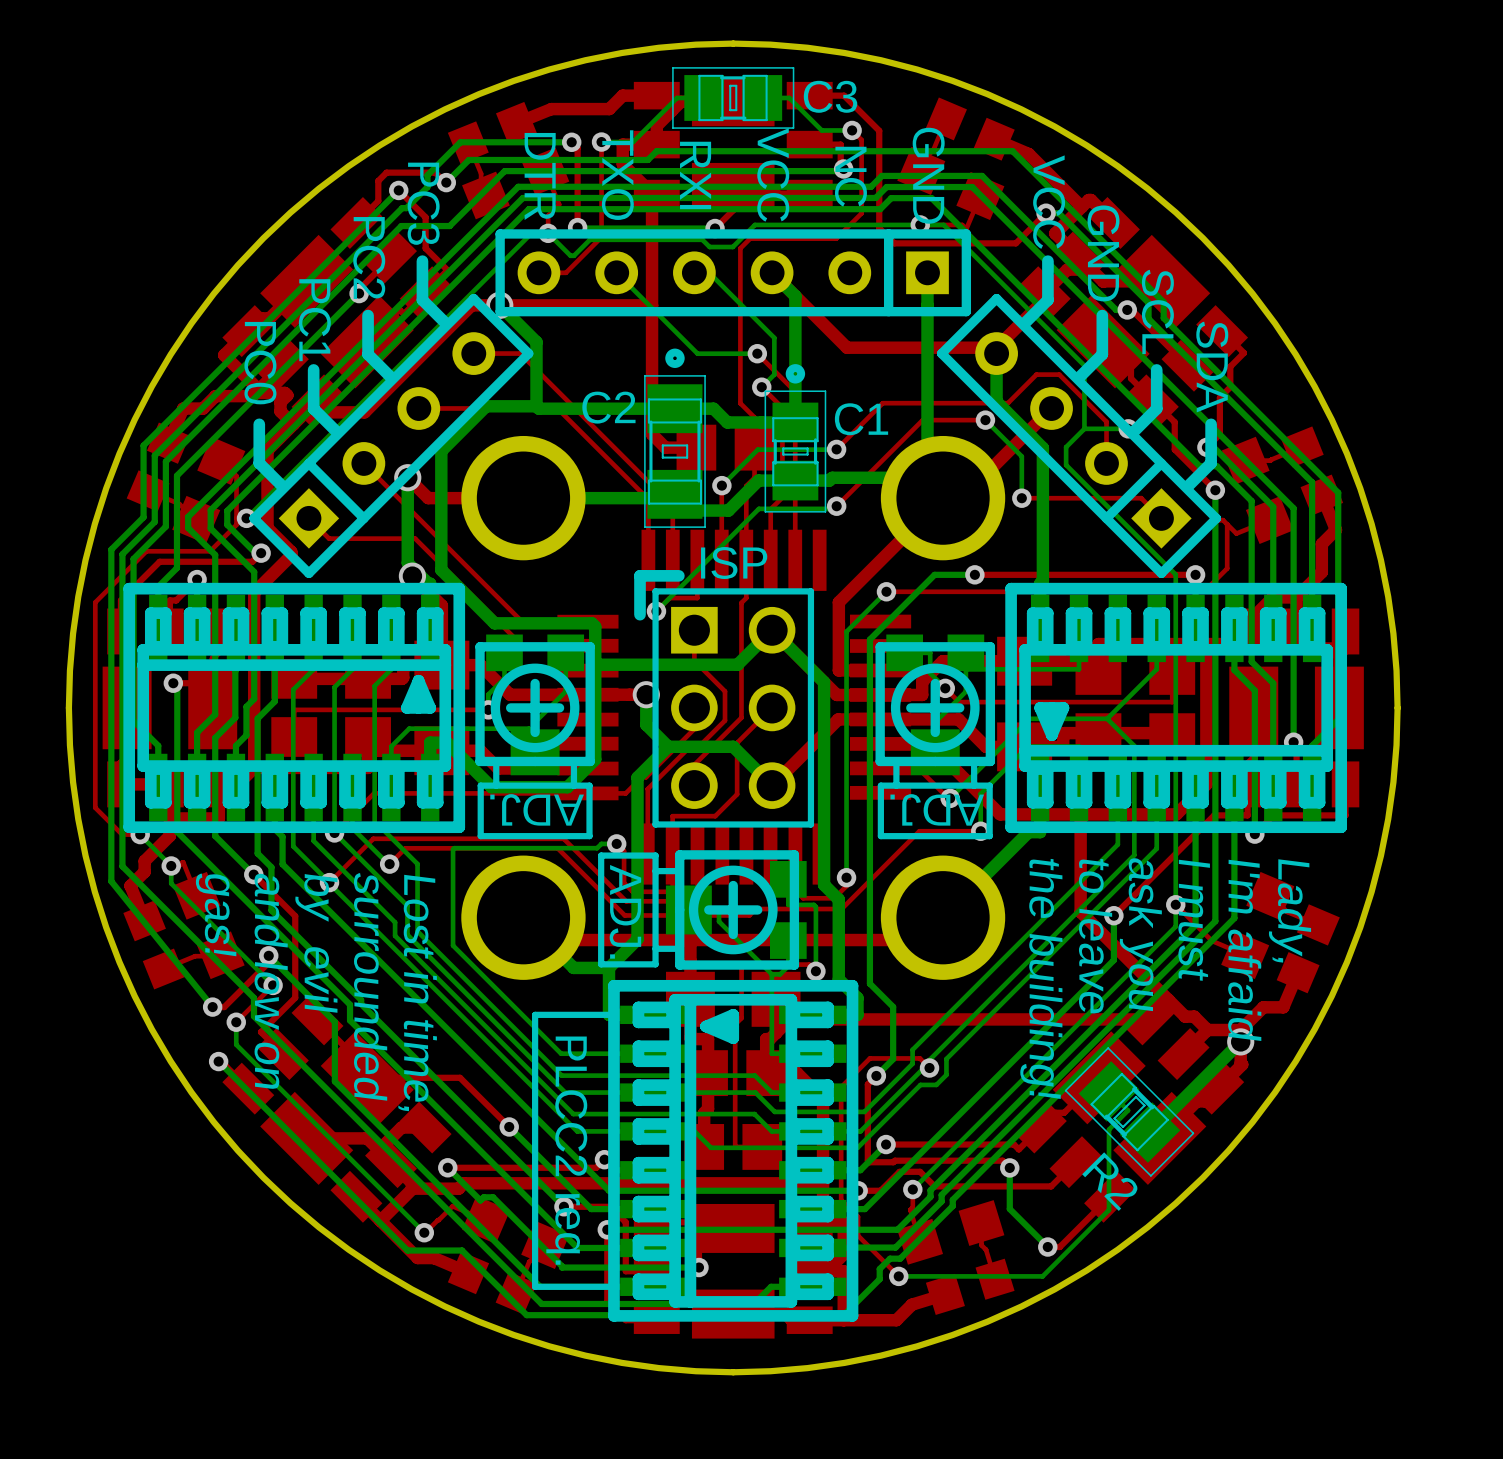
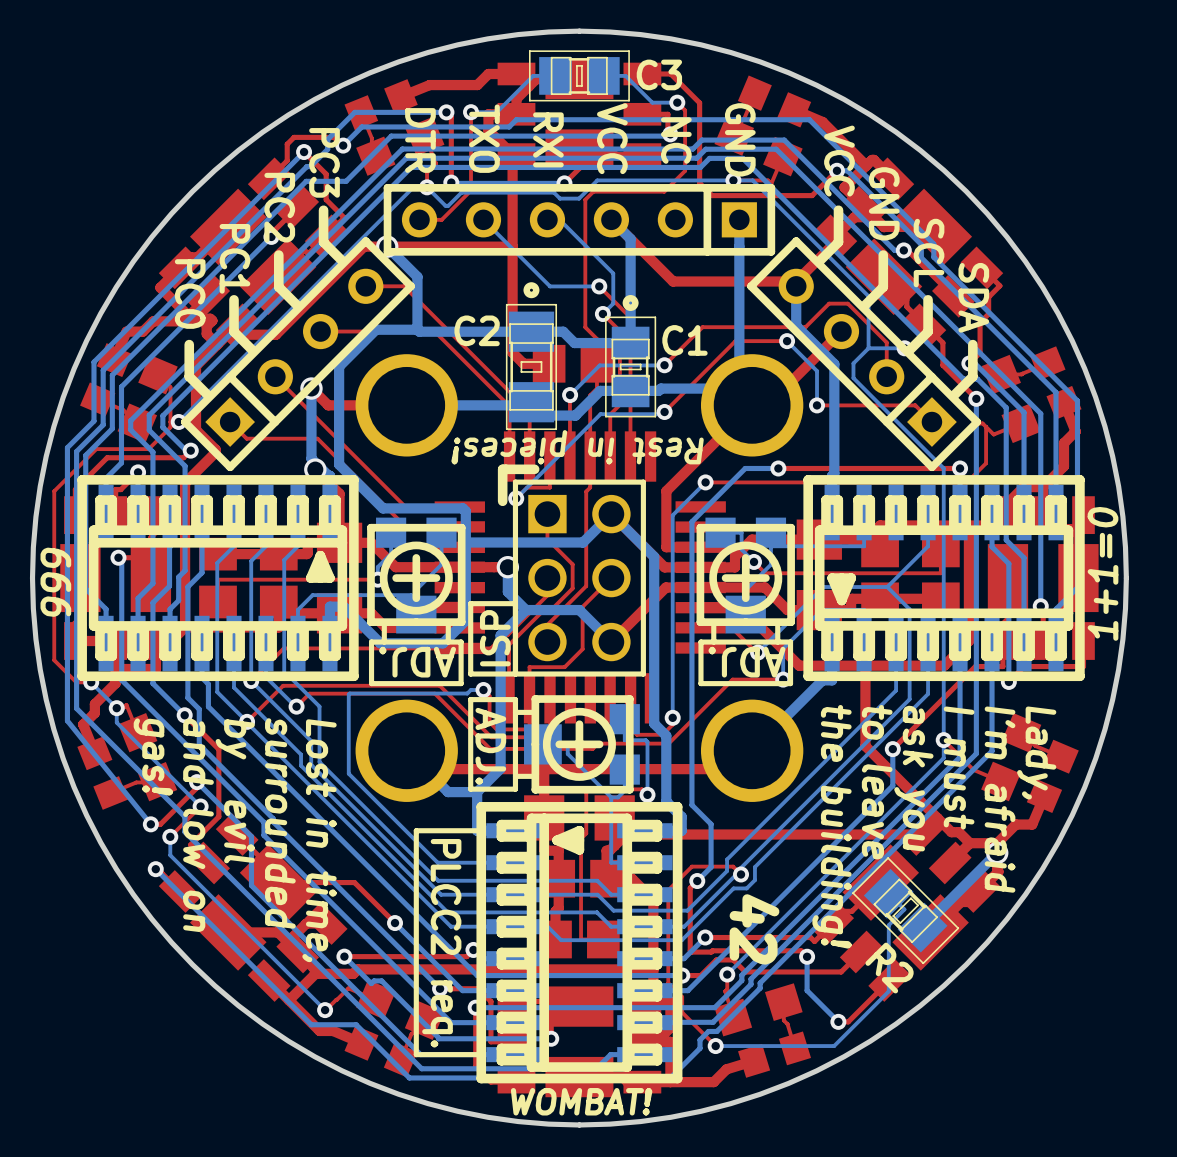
text: none -> Rest in pieces! (577, 447)
part value: ISP (734, 563) -> none
text: none -> 1+1=0 (1103, 573)
text: none -> 666 (55, 582)
line: none -> (515, 603) (515, 674) (470, 674) (470, 603) (515, 603)
text: none -> ISP (495, 638)
text: none -> 42 (754, 929)
text: none -> WOMBAT! (581, 1101)

